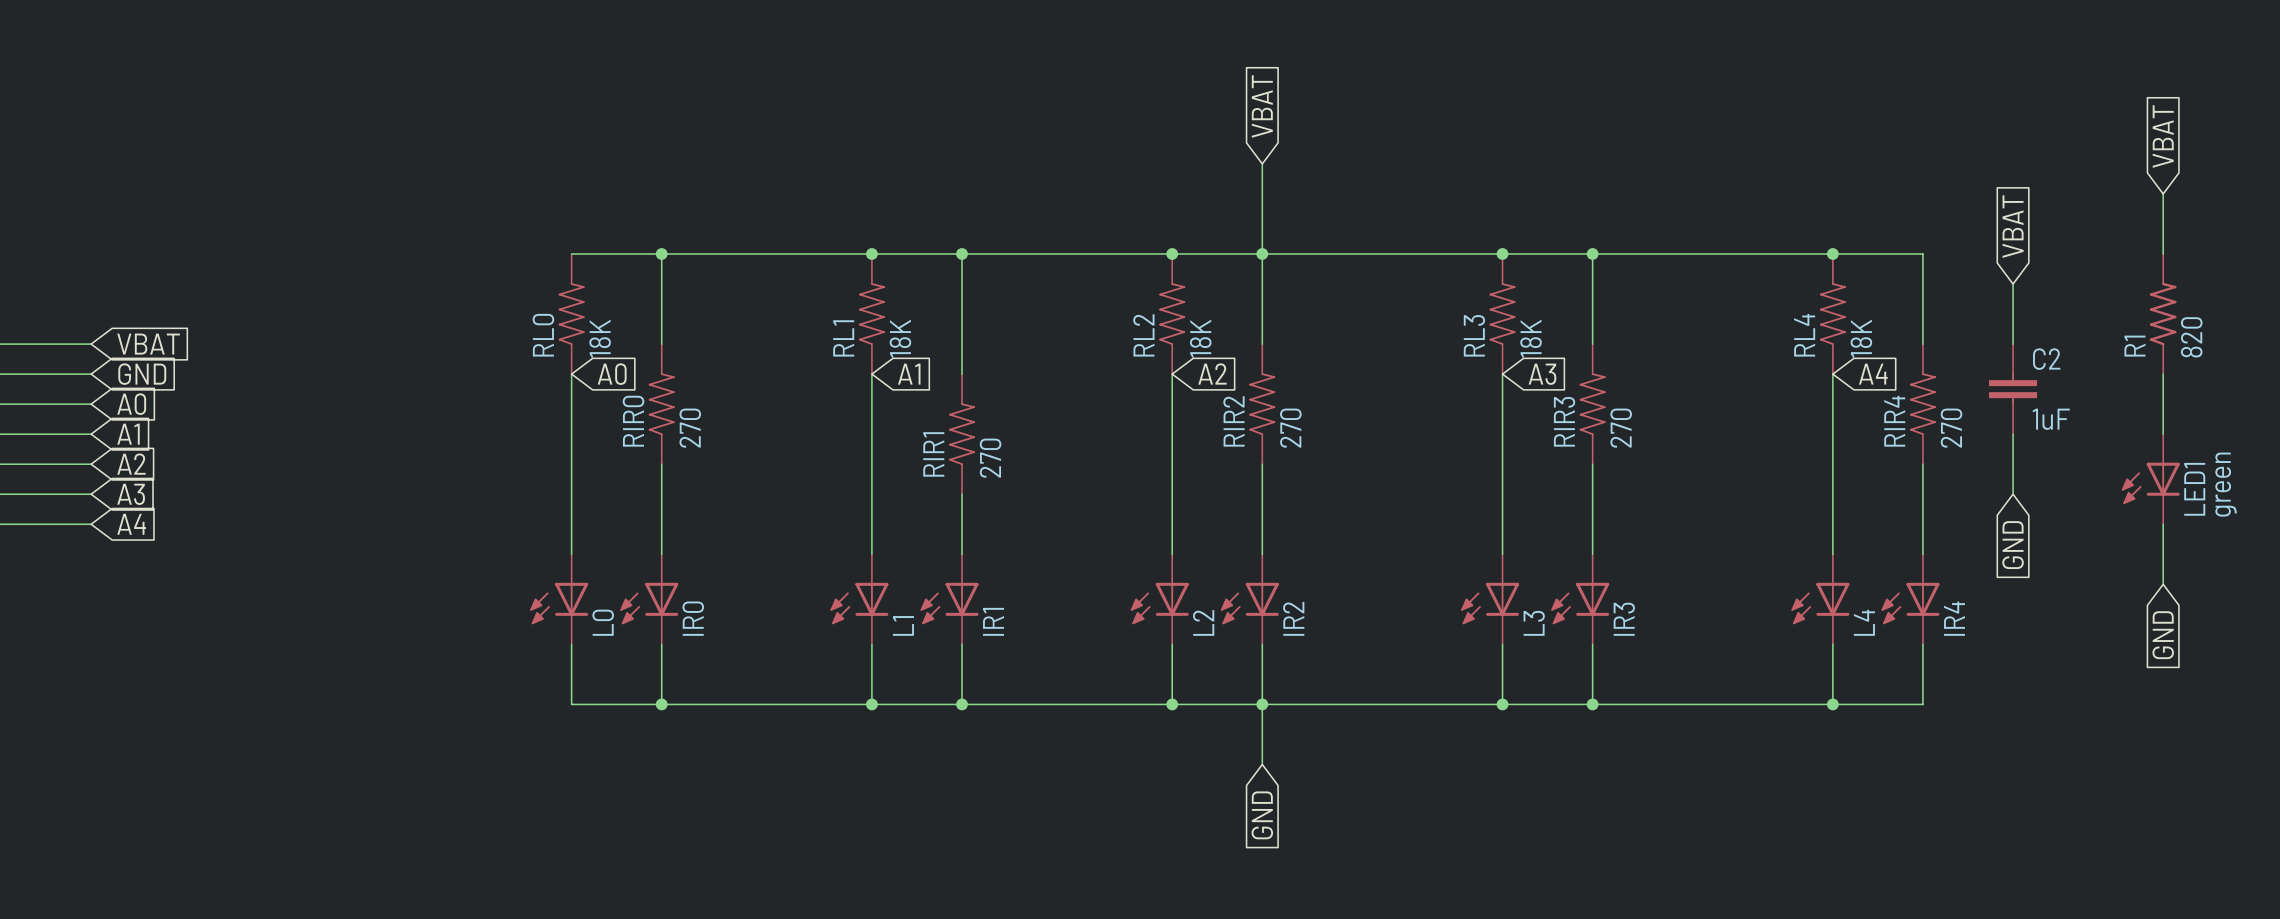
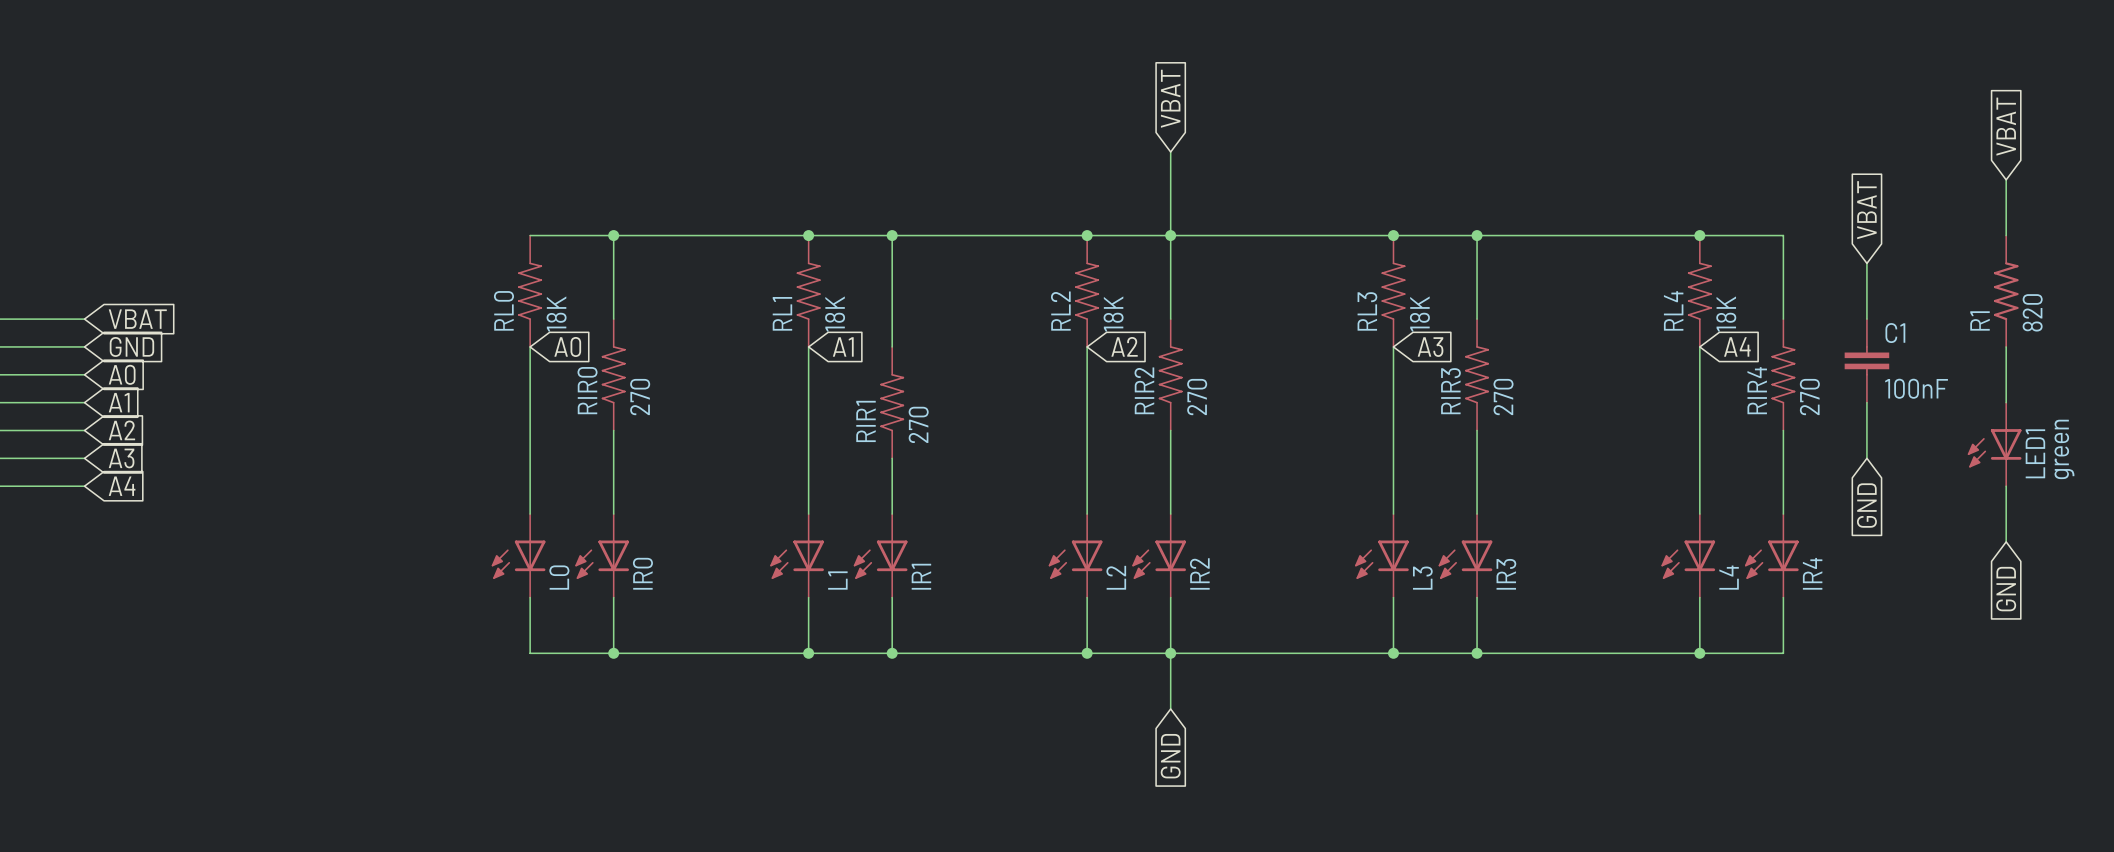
C2 name: C2 (2046, 359) -> C1 (1895, 333)
C2 value: 1uF (2051, 419) -> 100nF (1916, 388)

